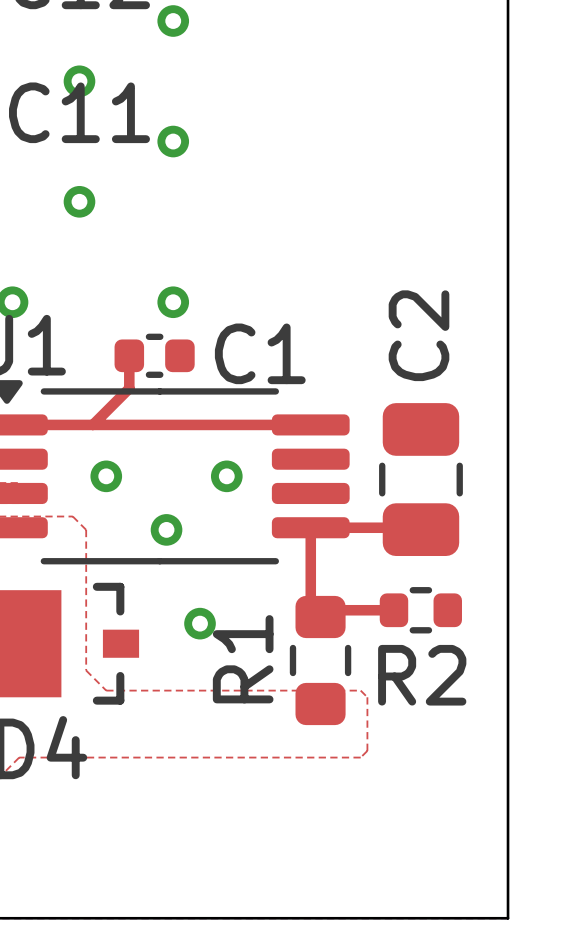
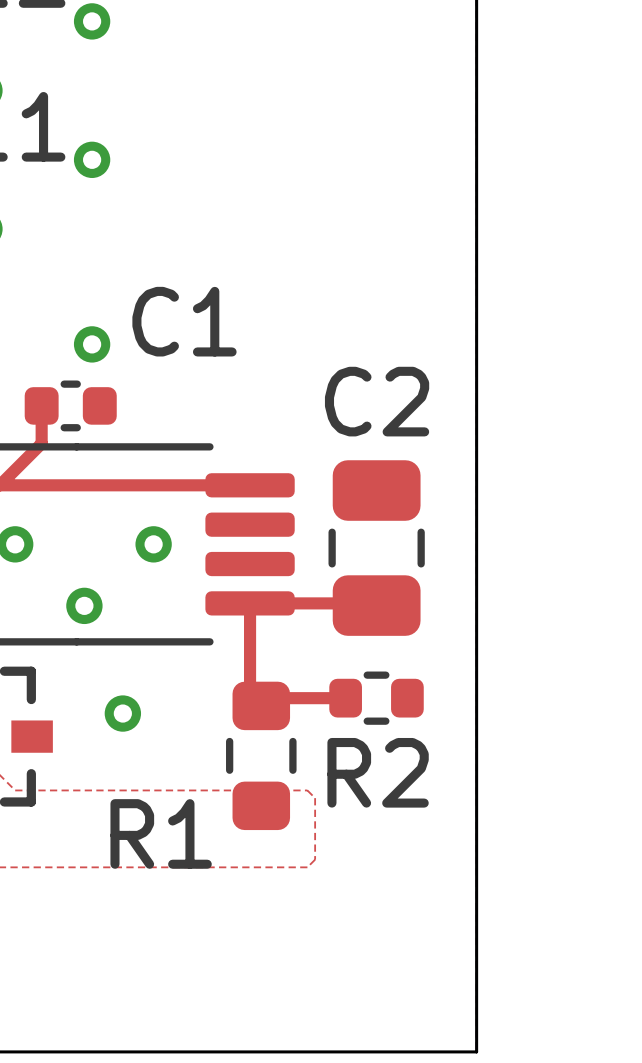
C2 name rotation: 0° (419, 335) -> 90° clockwise (377, 401)
C1 name position: C1 (260, 353) -> C1 (184, 321)
R1 name rotation: 0° (243, 659) -> 90° clockwise (161, 833)

